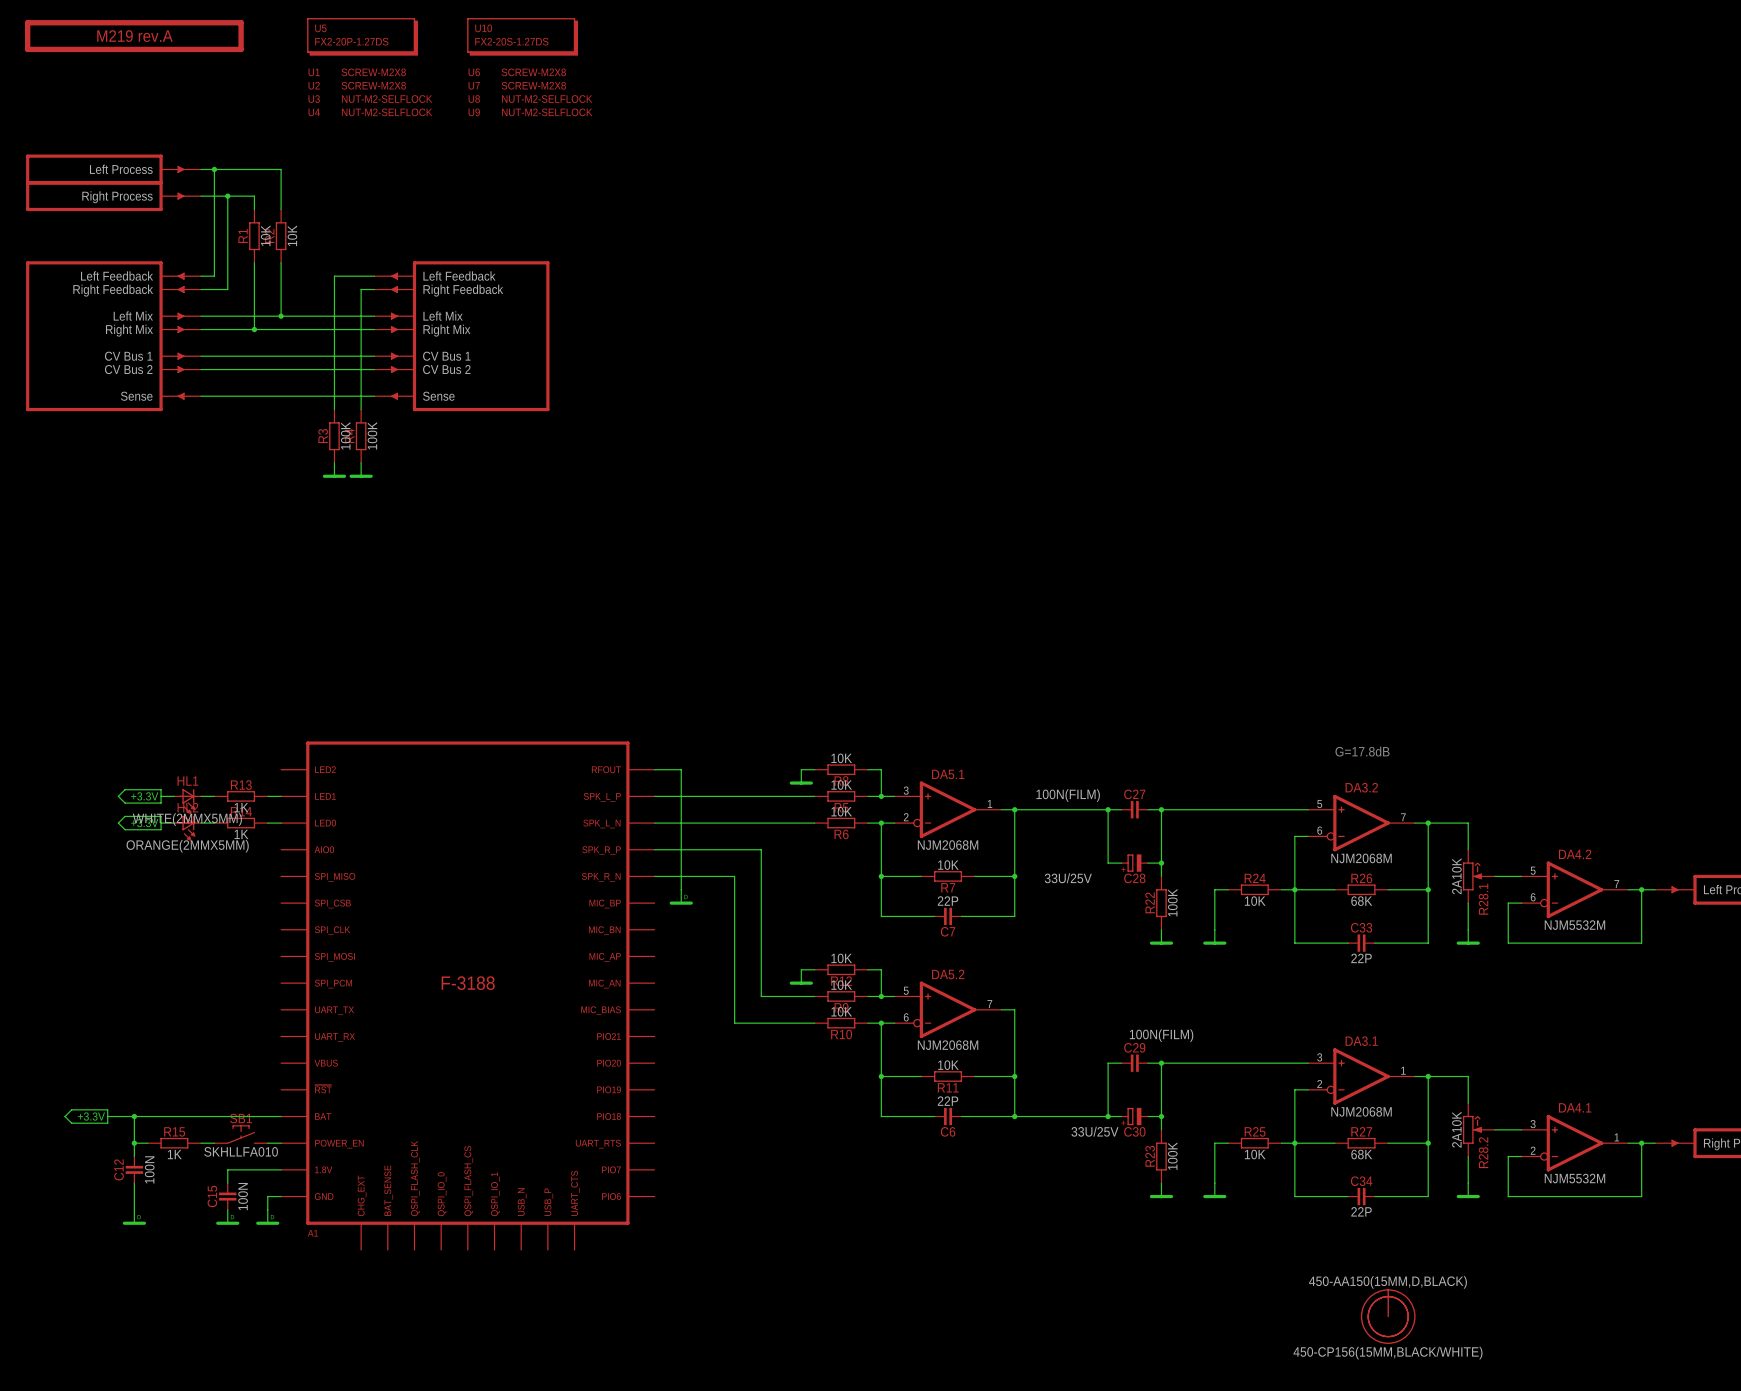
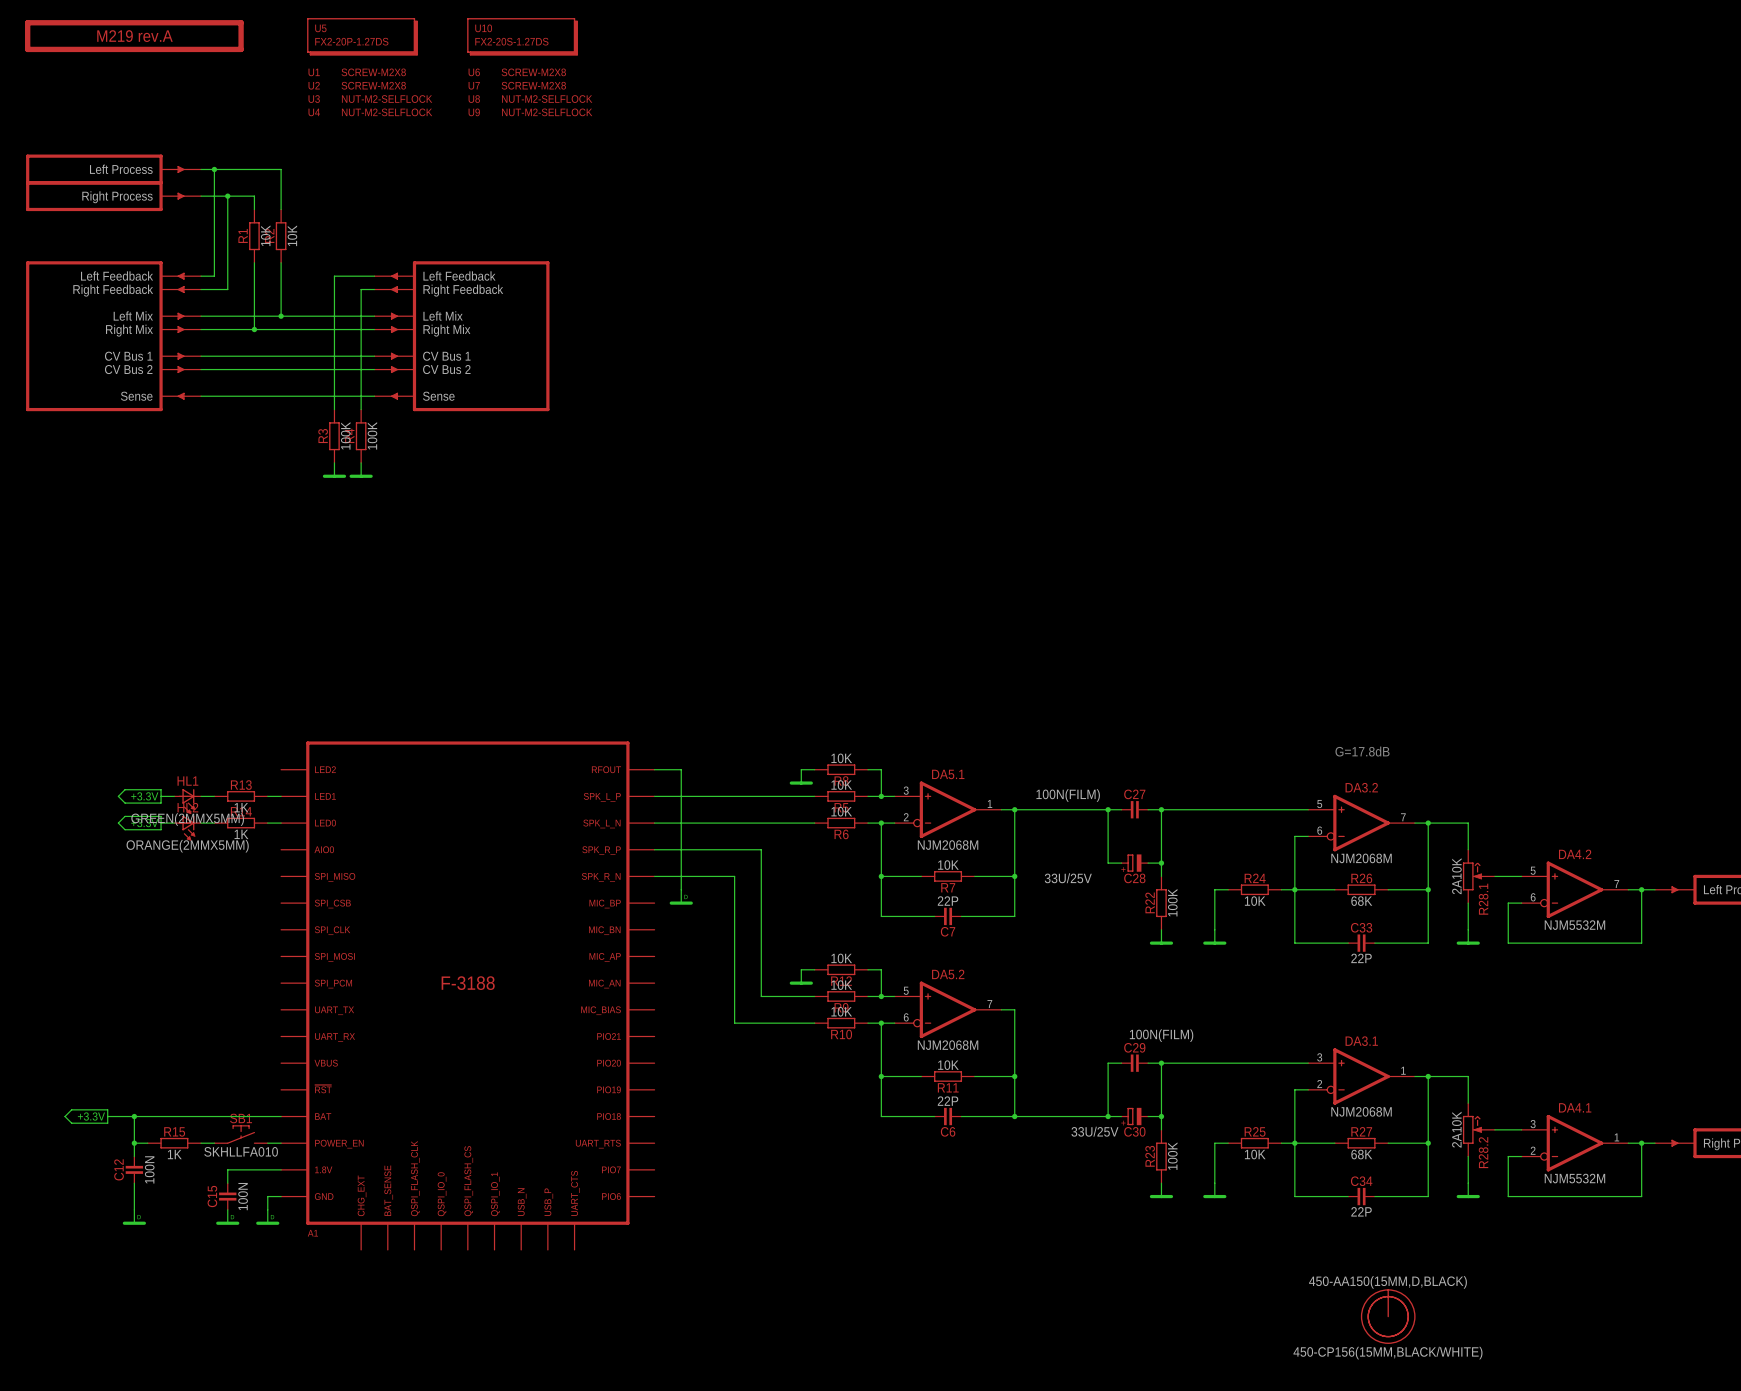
HL1 value: WHITE(2MMX5MM) (187, 819) -> GREEN(2MMX5MM) (187, 819)

